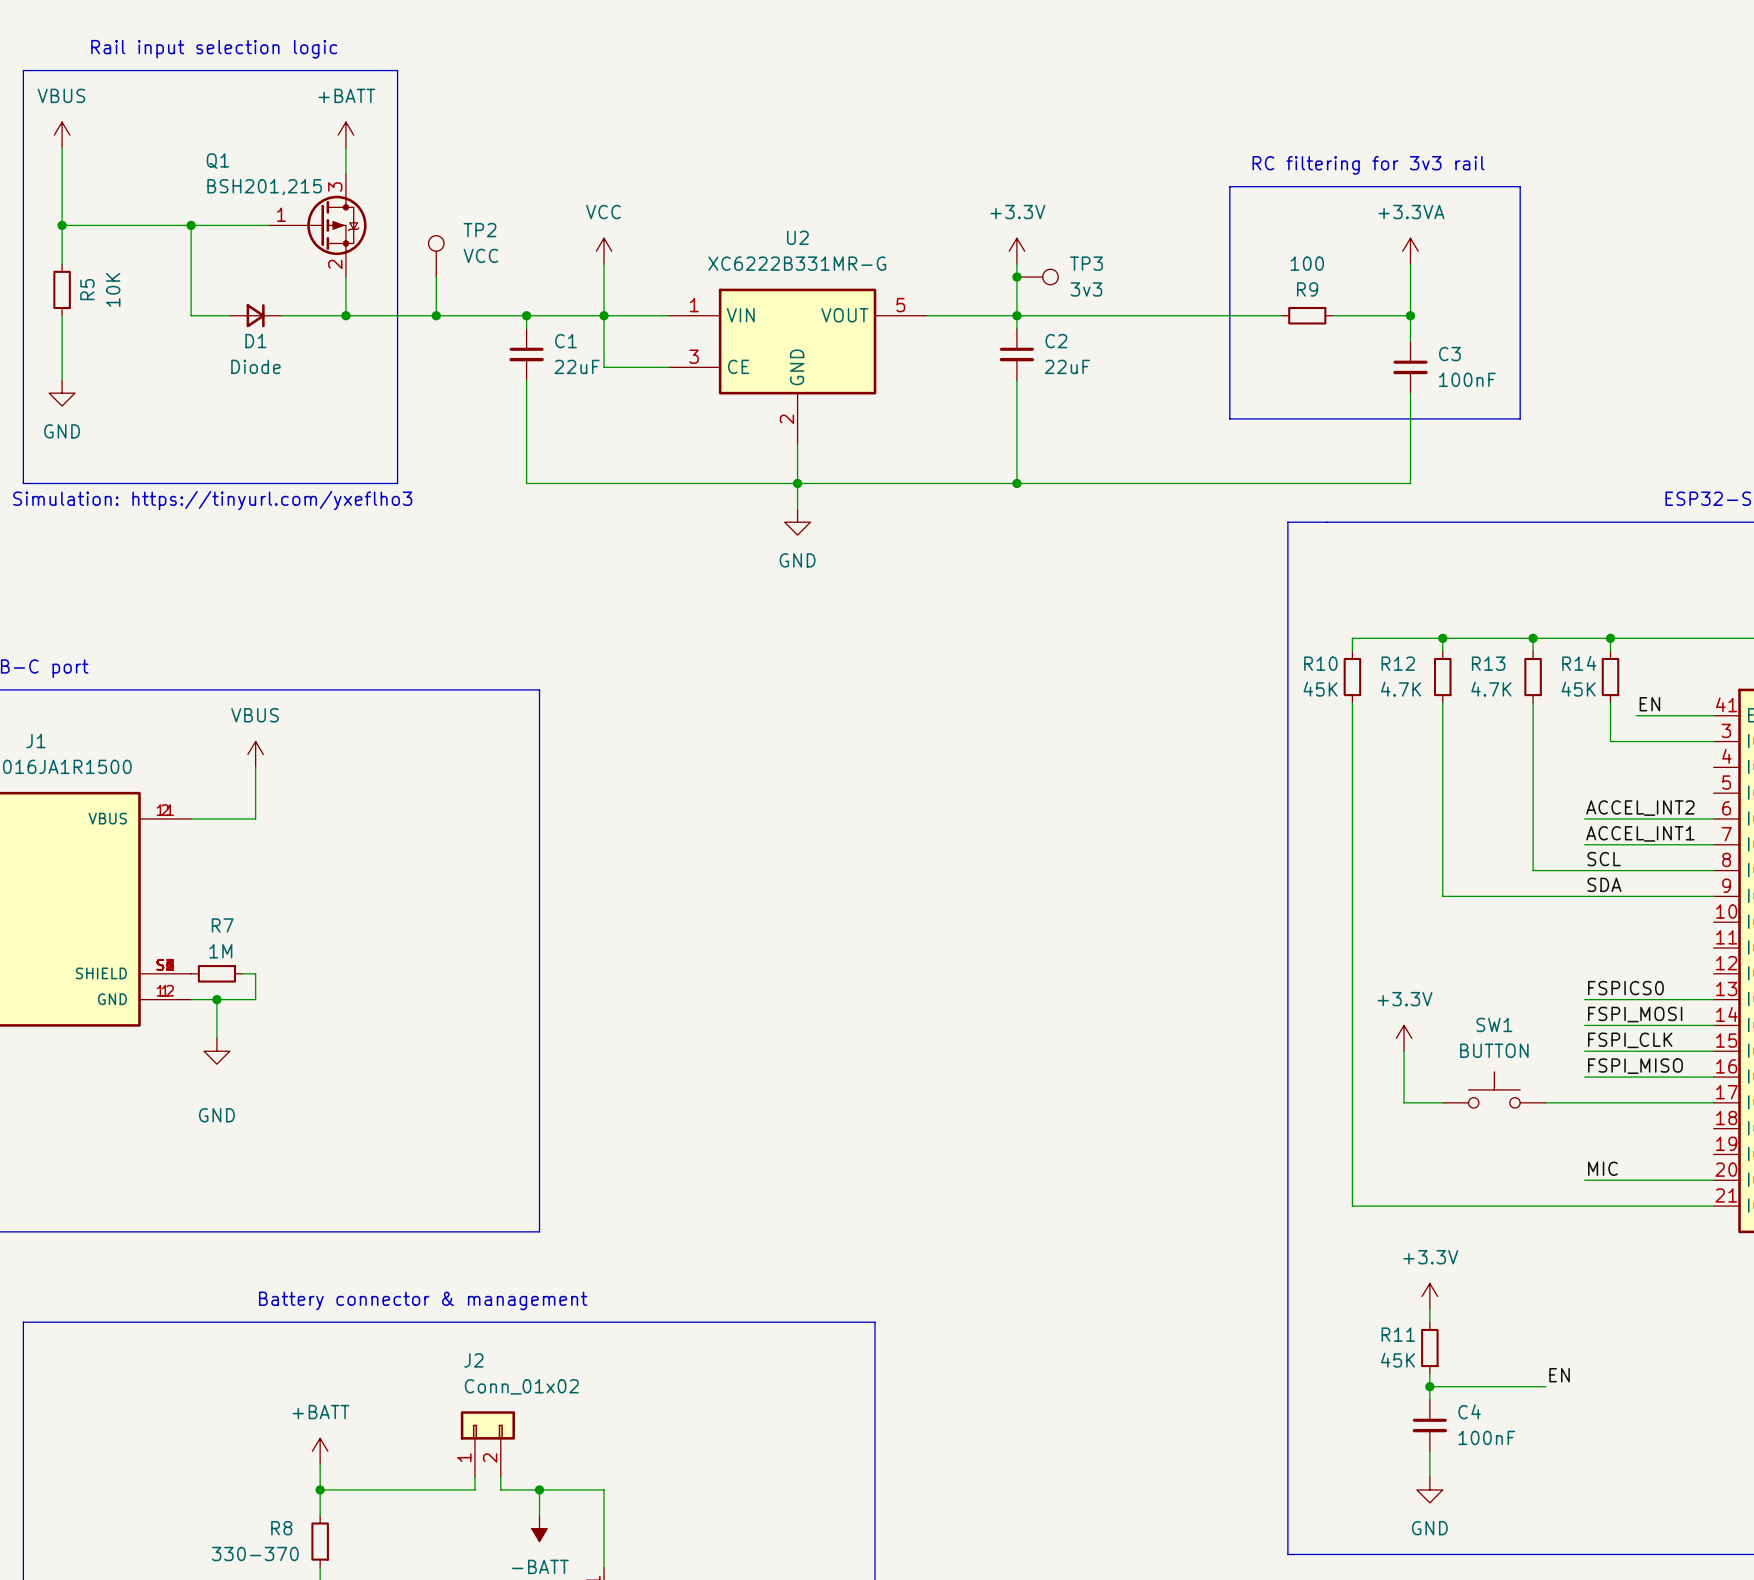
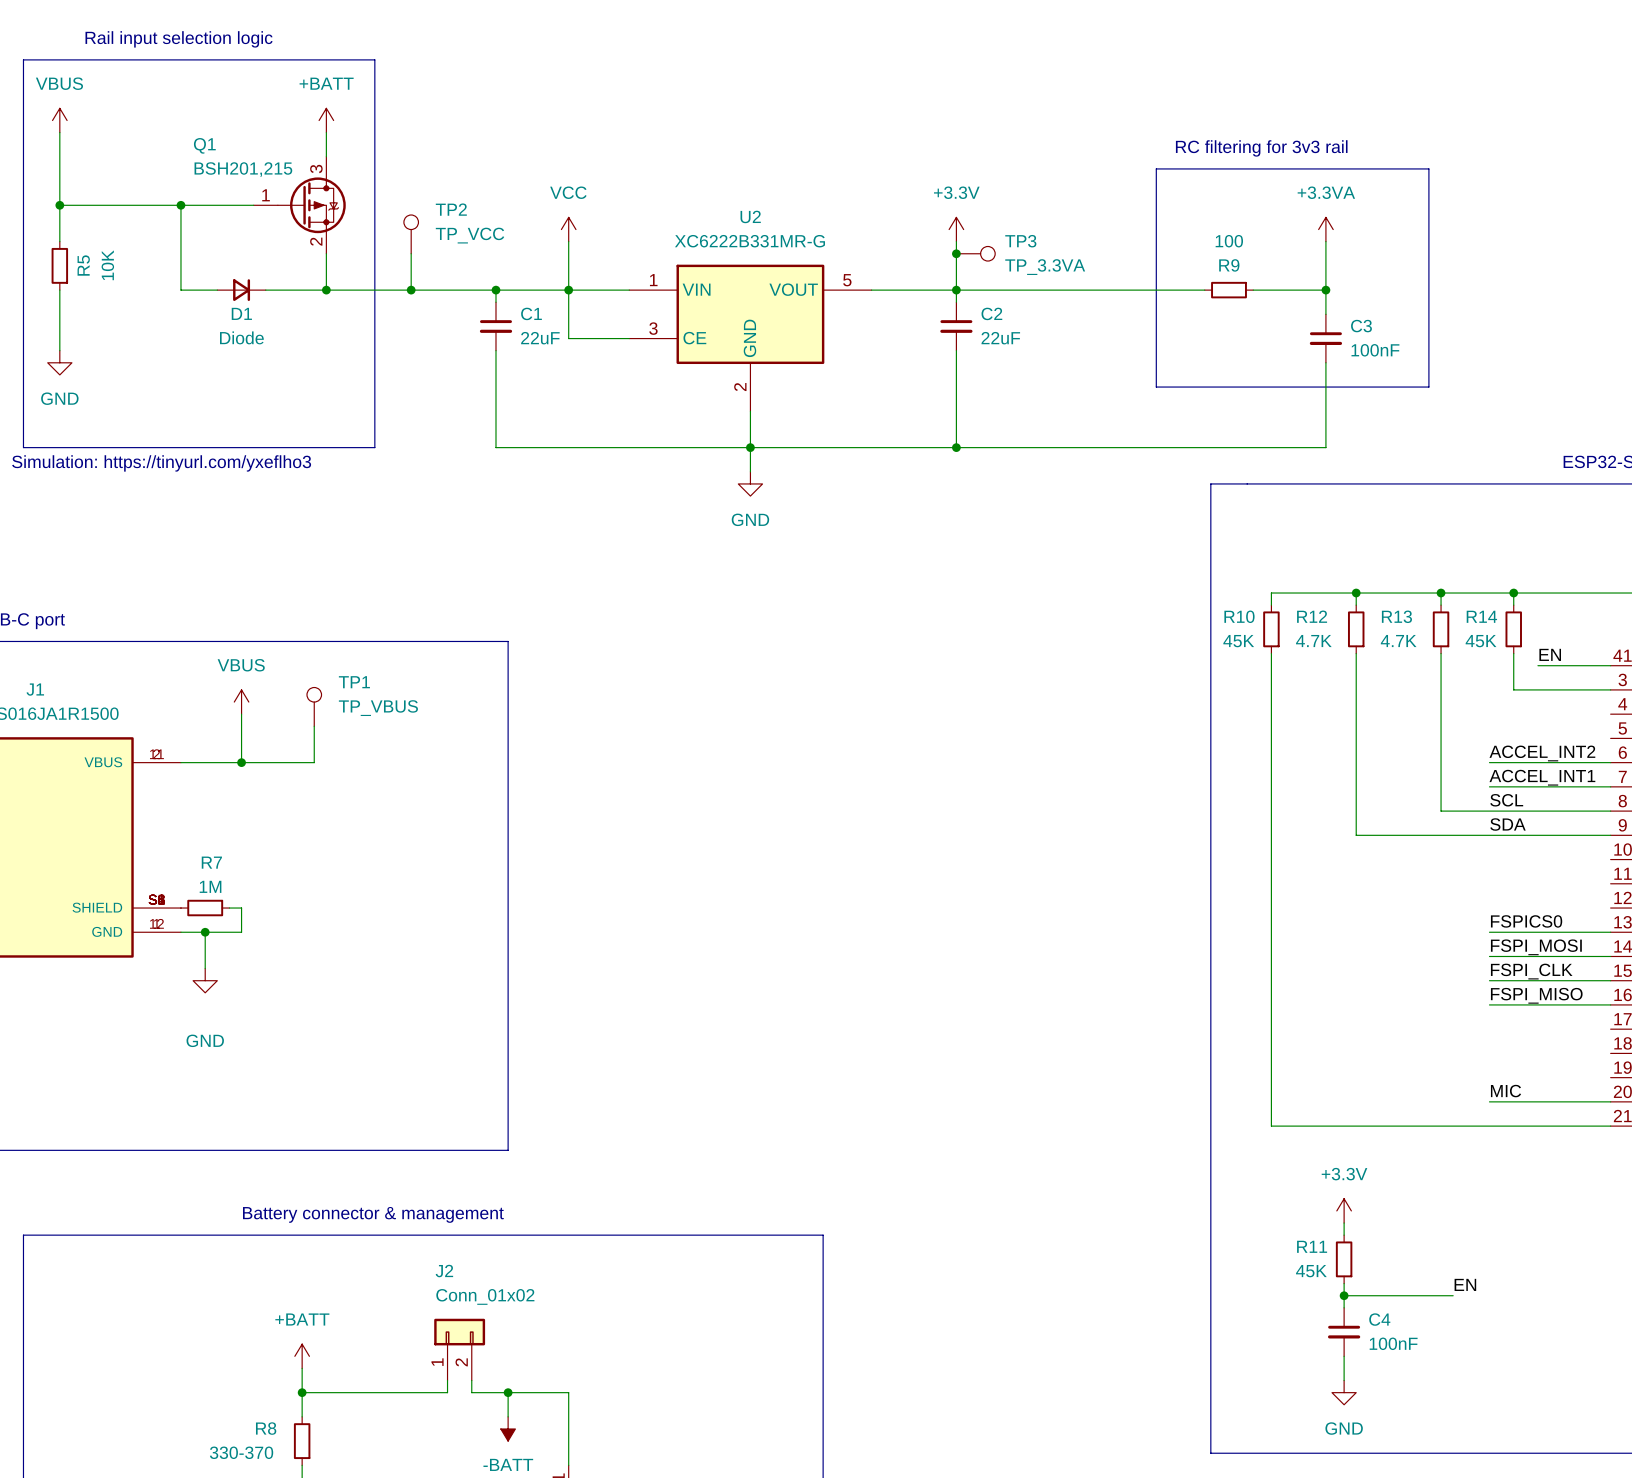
TP2 value: VCC (480, 255) -> TP_VCC (470, 235)
TP3 value: 3v3 (1086, 289) -> TP_3.3VA (1045, 267)
TP1: none -> TP_VBUS (314, 706)
wire: none -> (314, 726) (314, 762) (241, 762)
junction: none -> (241, 762)
power symbol: +3.3V (1404, 1038) -> none
wire: (1404, 1051) (1404, 1102) (1442, 1102) -> none
SW1: BUTTON (1494, 1089) -> none
wire: (1545, 1102) (1713, 1102) -> none

